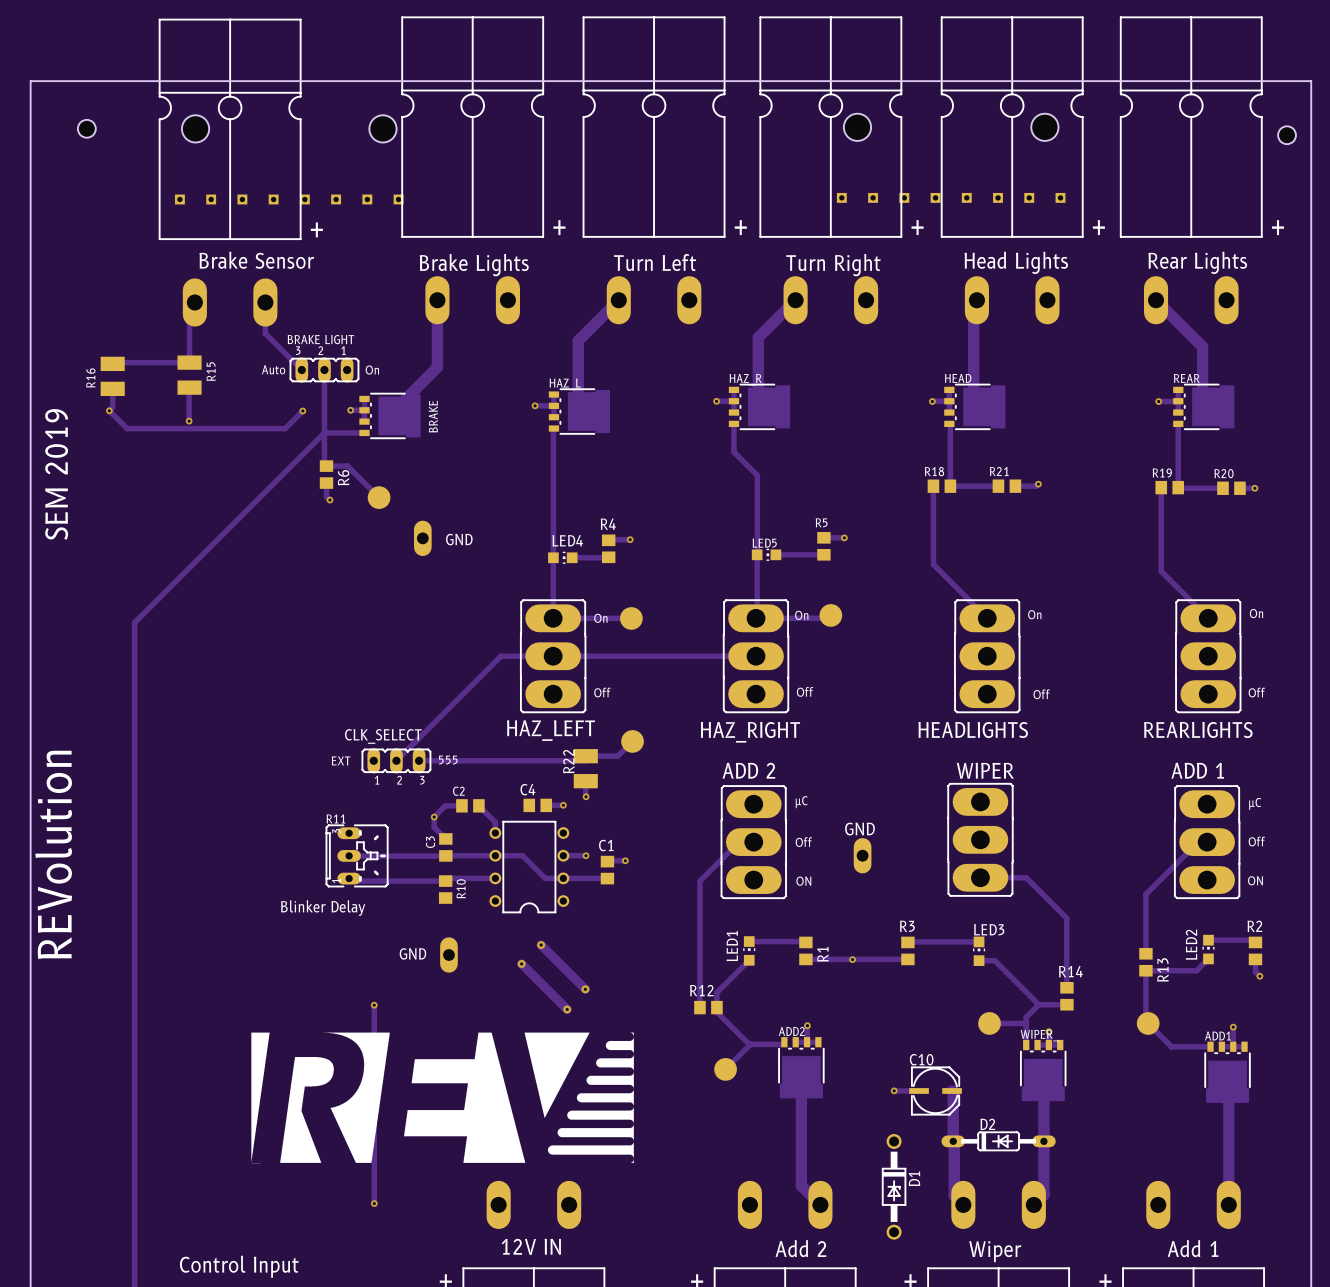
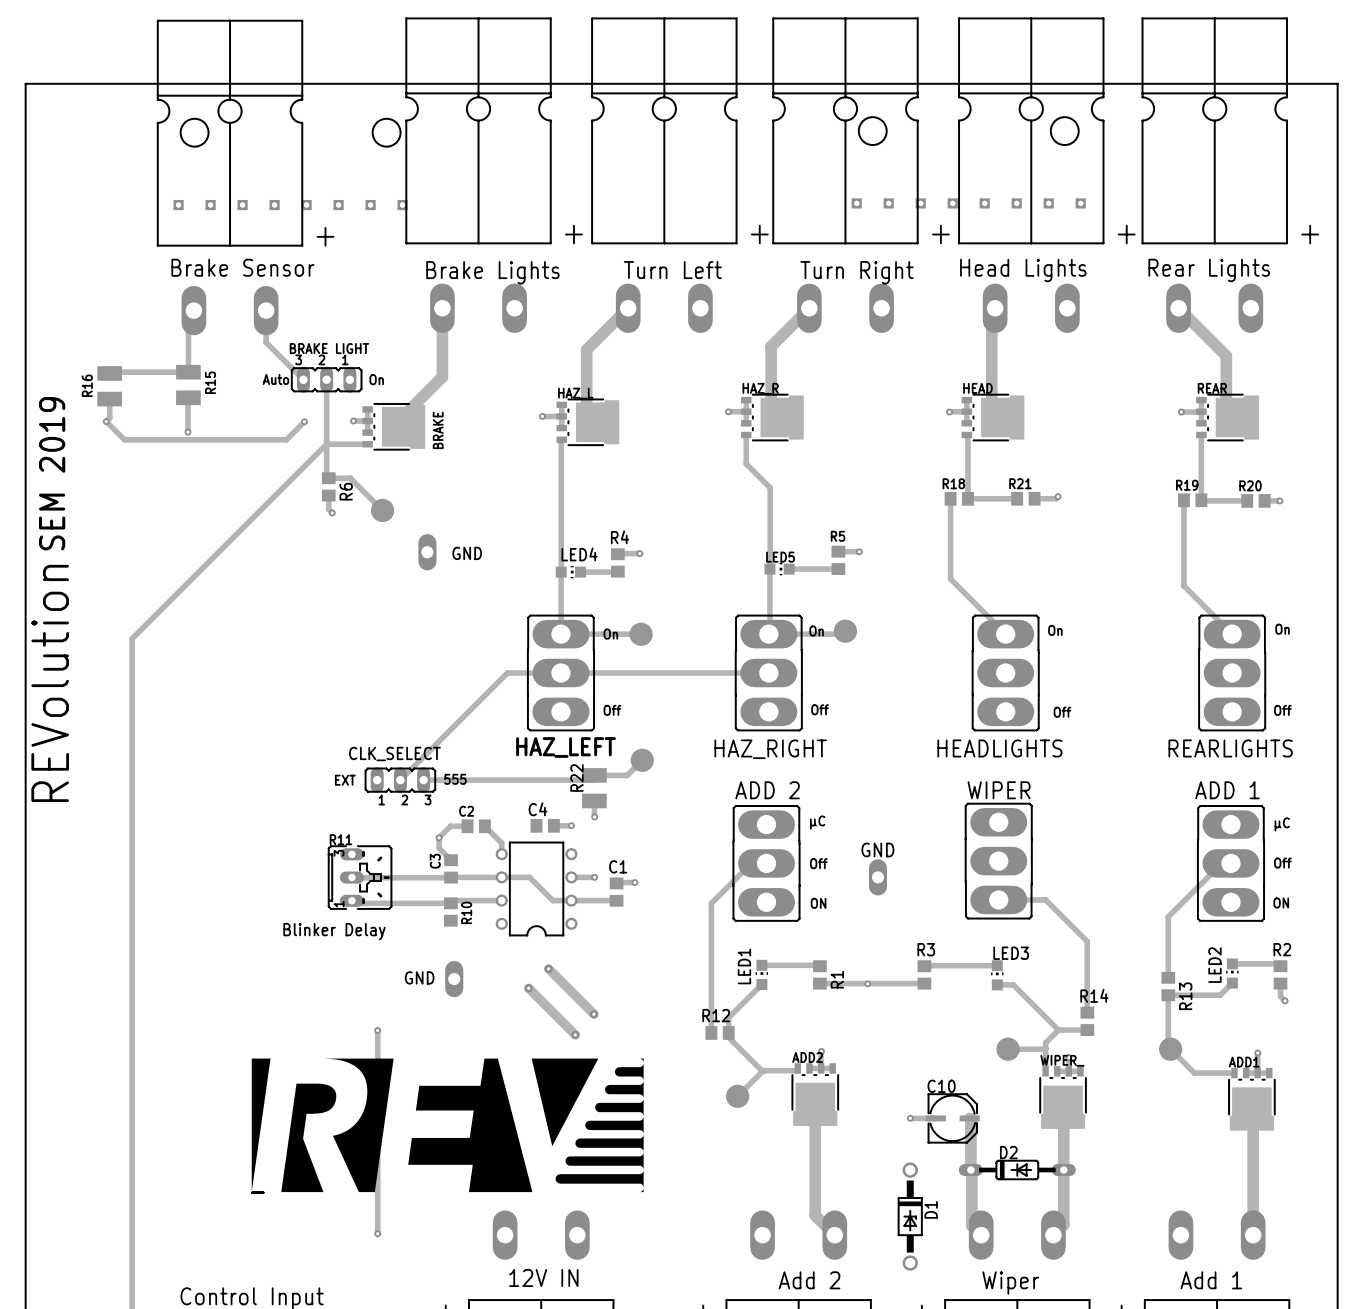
hole: (86, 128) -> none
hole: (1287, 135) -> none
text position: REVolution (53, 854) -> REVolution (50, 683)

